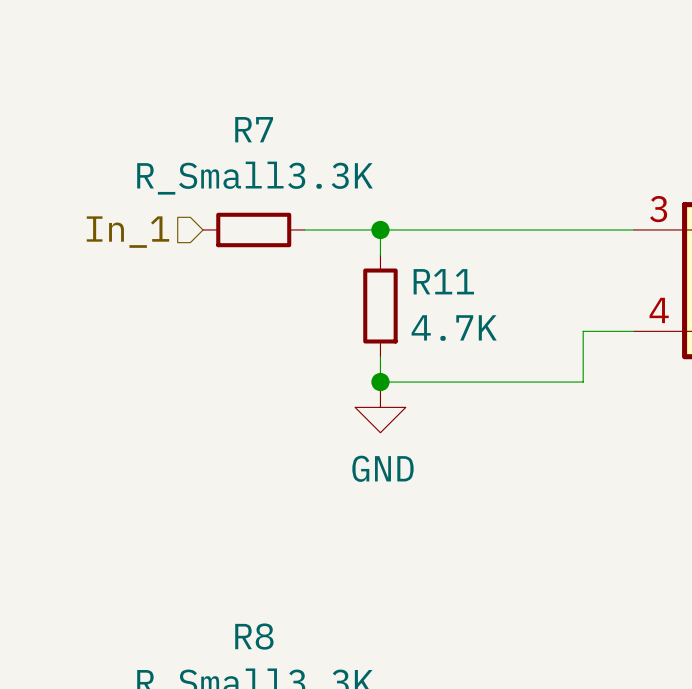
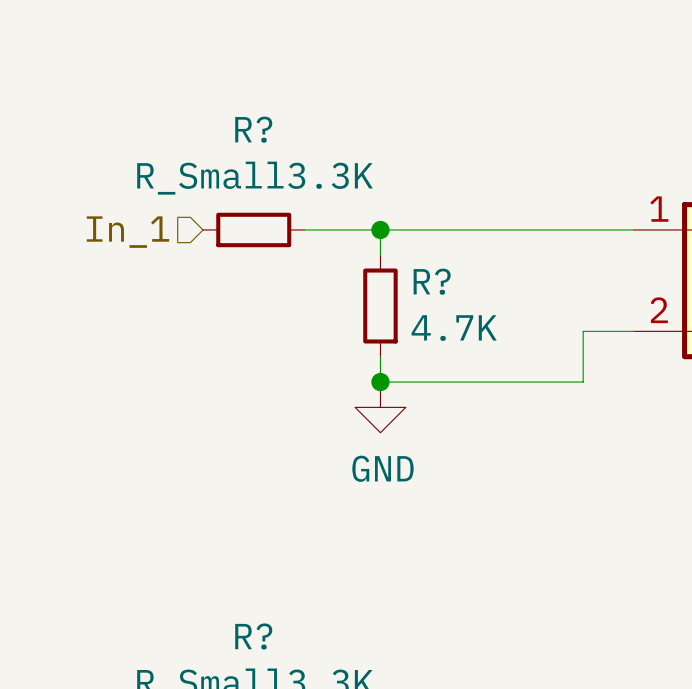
R7 name: R7 (254, 129) -> R? (253, 129)
part pin number: 3 (658, 209) -> 1 (659, 209)
R11 name: R11 (443, 281) -> R? (432, 281)
part pin number: 4 (659, 310) -> 2 (659, 310)
R8 name: R8 (254, 636) -> R? (253, 636)

